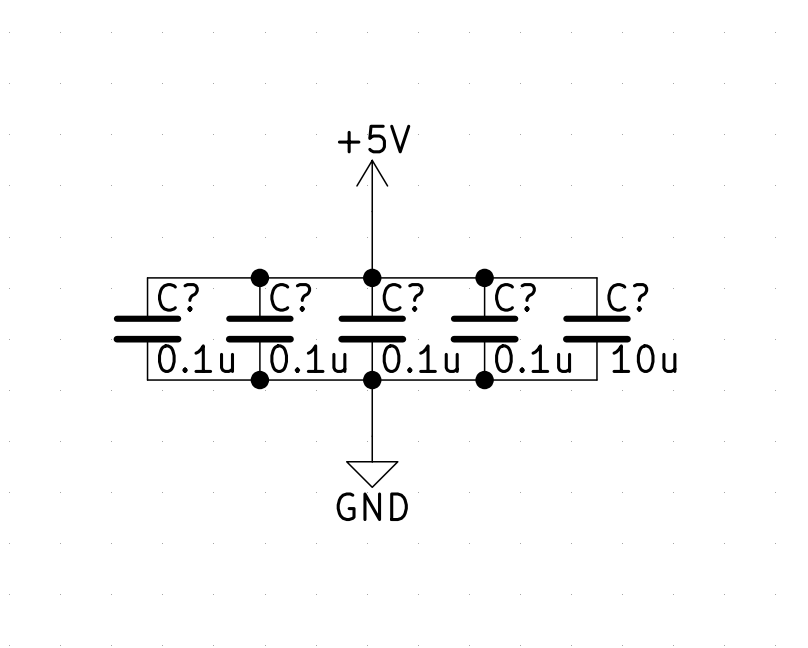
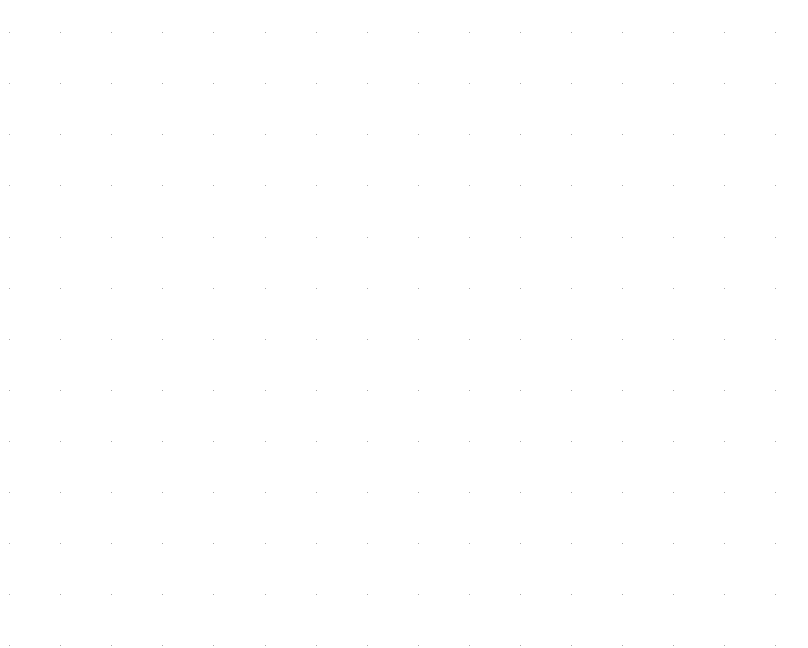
power symbol: +5V (372, 185) -> none
wire: (372, 211) (372, 277) -> none
wire: (147, 277) (596, 277) -> none
junction: (259, 277) -> none
junction: (372, 277) -> none
junction: (484, 277) -> none
C?: 0.1u (147, 328) -> none
C?: 0.1u (259, 328) -> none
C?: 0.1u (372, 328) -> none
C?: 0.1u (484, 328) -> none
C?: 10u (596, 328) -> none
wire: (147, 380) (596, 380) -> none
junction: (259, 380) -> none
wire: (372, 380) (372, 436) -> none
junction: (372, 380) -> none
junction: (484, 380) -> none
power symbol: GND (372, 461) -> none

